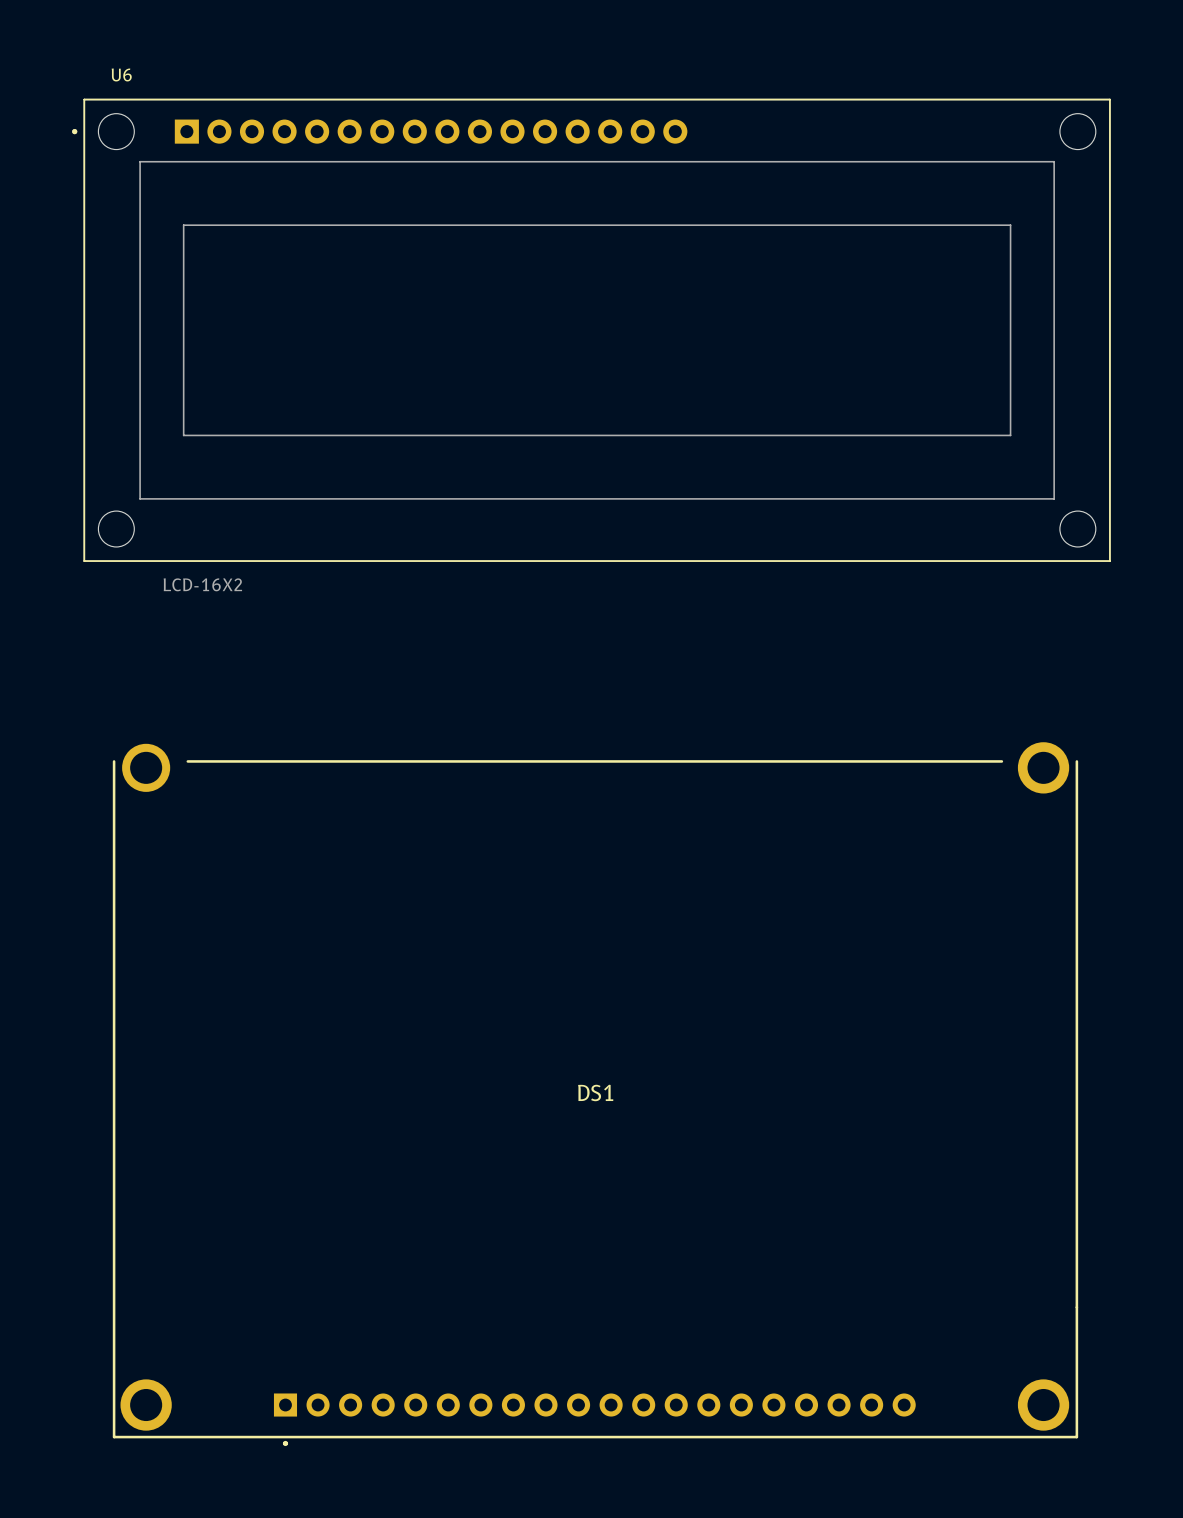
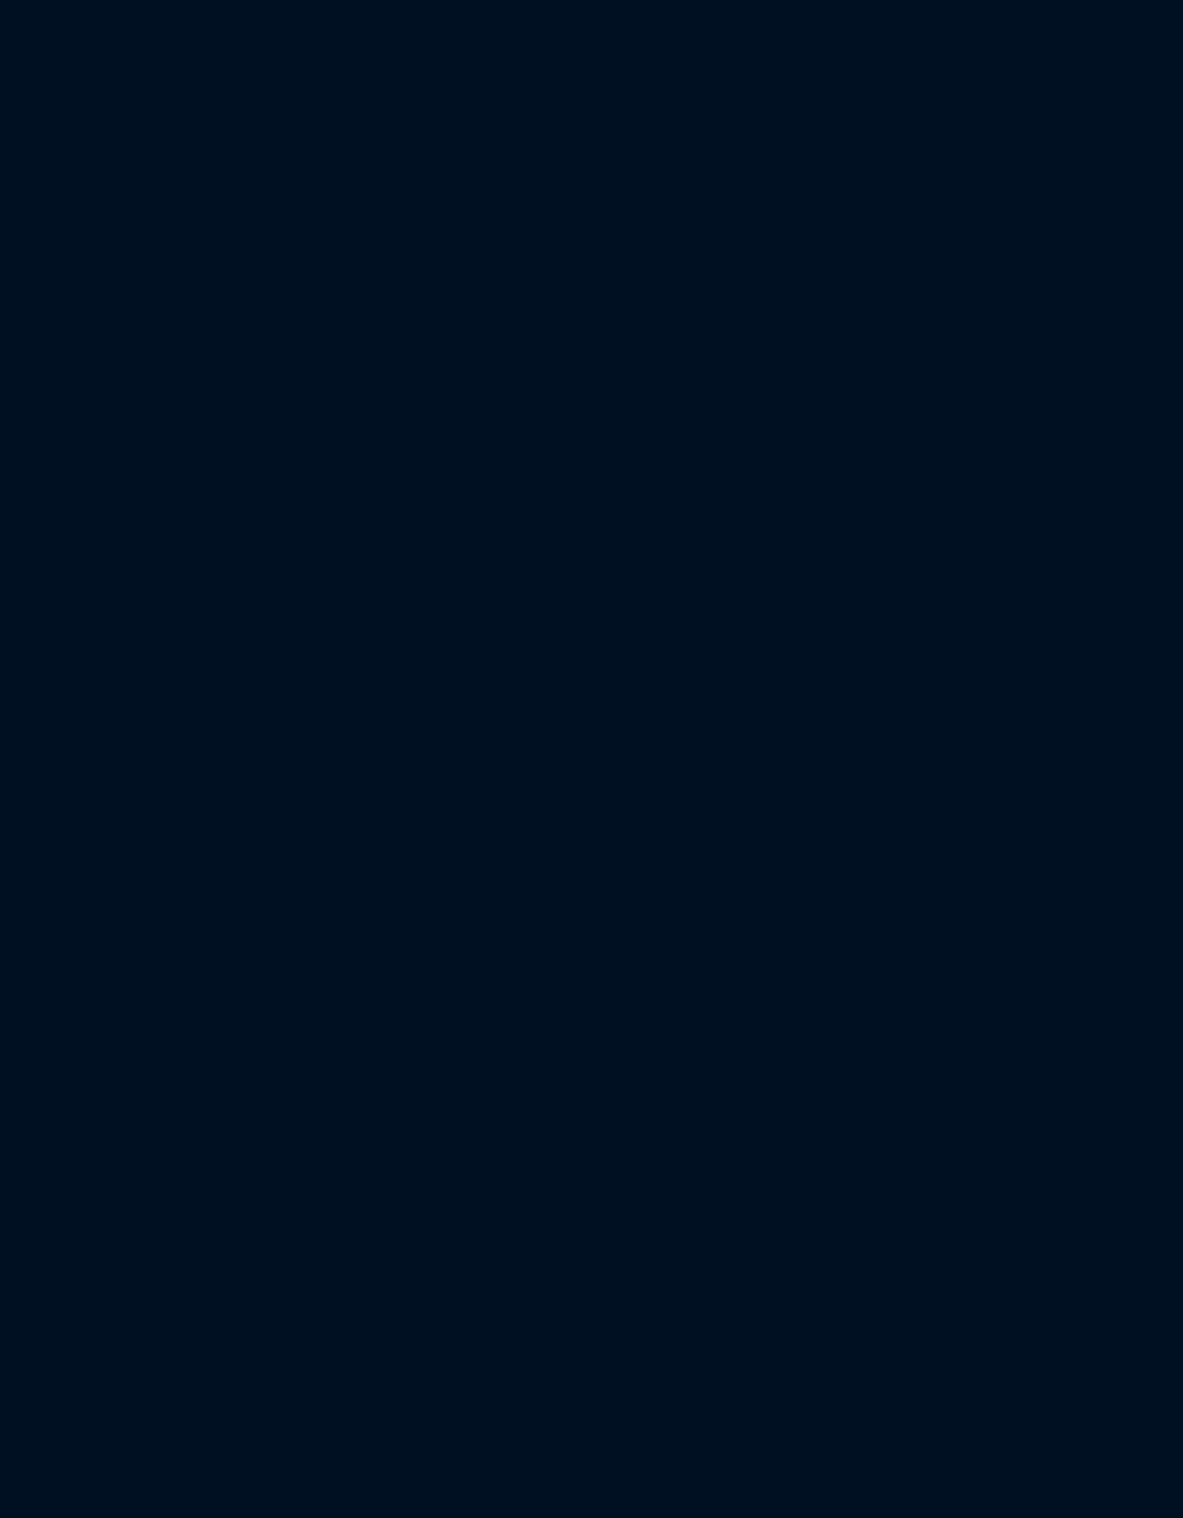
U6: LCD-16X2 (591, 330) -> none
DS1: (595, 1094) -> none

